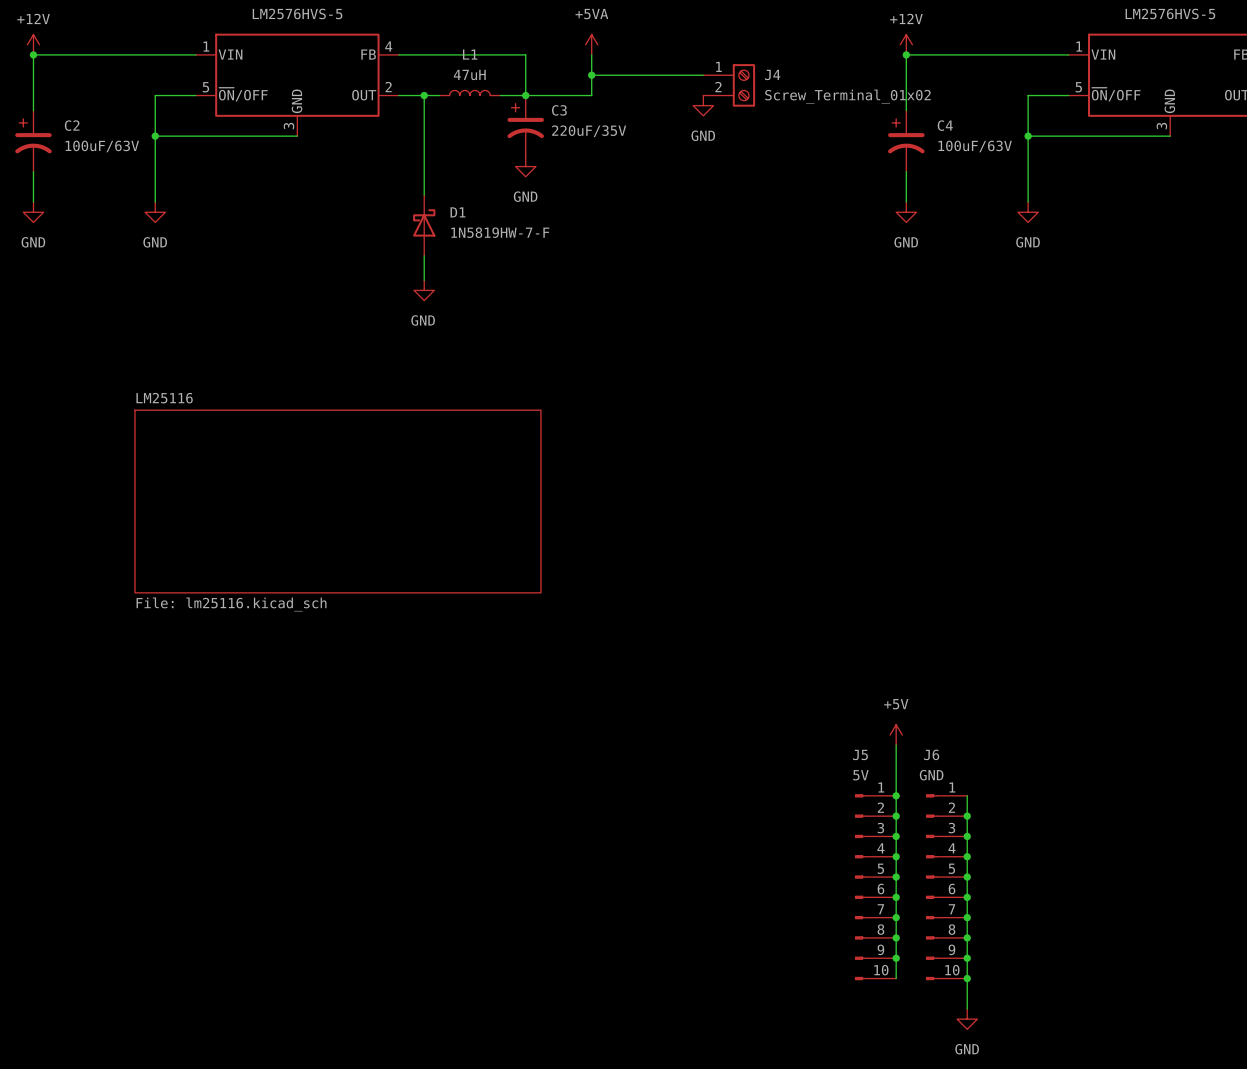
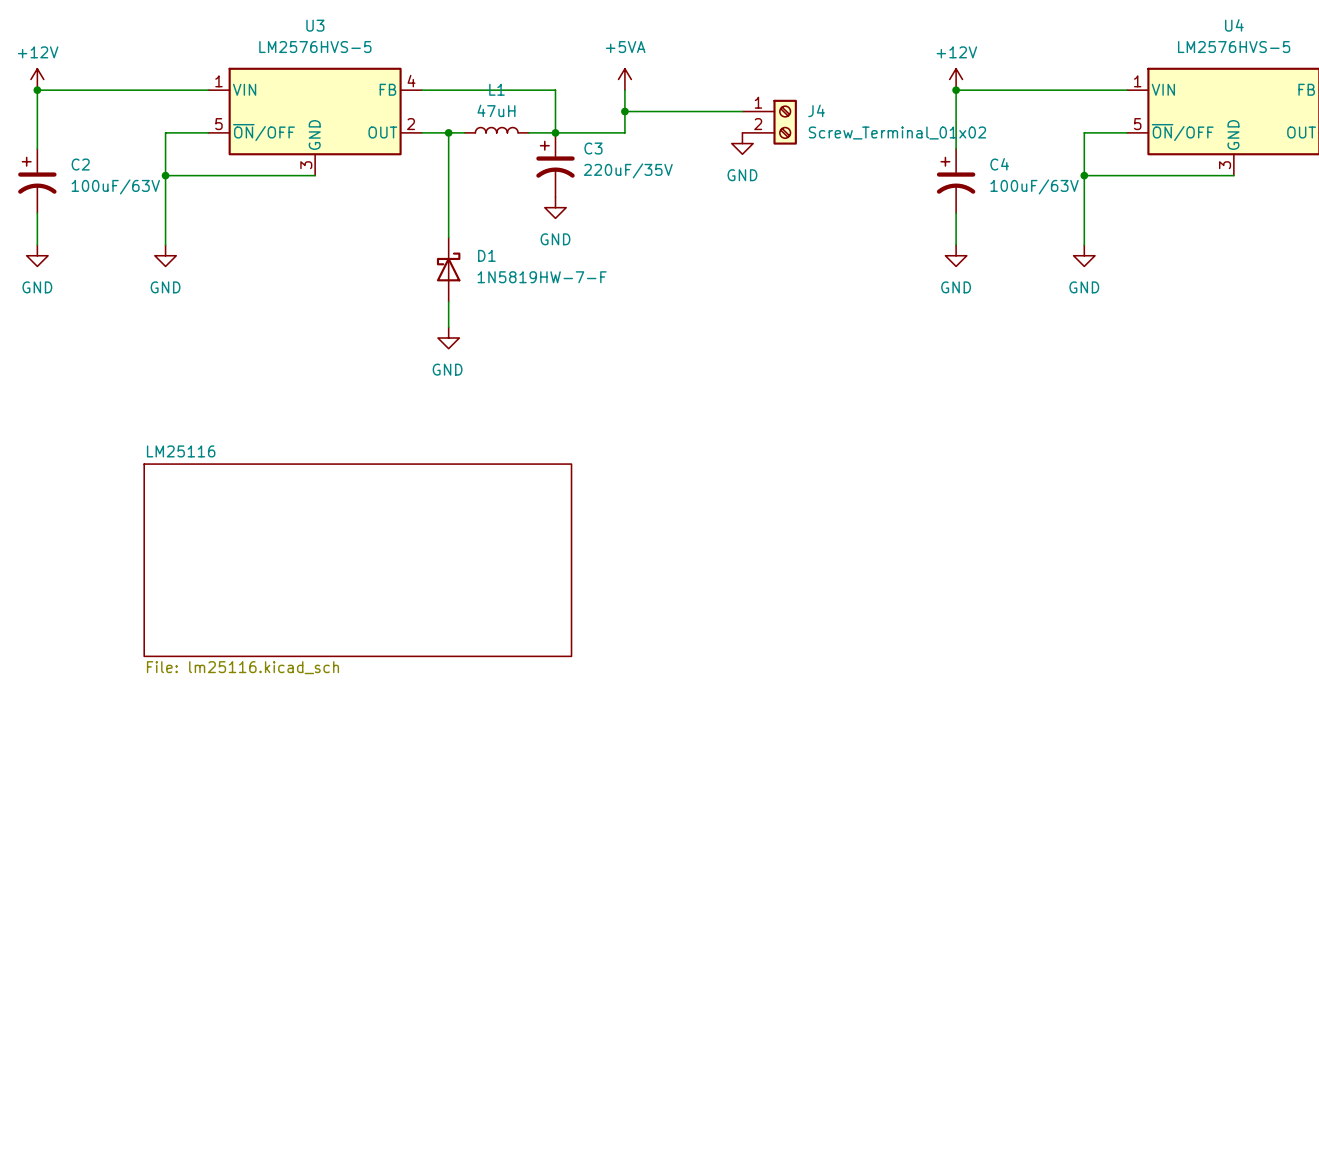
power symbol: +5V (896, 734) -> none
wire: (896, 745) (896, 978) -> none
junction: (896, 795) -> none
wire: (967, 795) (967, 1008) -> none
junction: (896, 816) -> none
junction: (967, 816) -> none
junction: (896, 836) -> none
junction: (967, 836) -> none
junction: (896, 856) -> none
junction: (967, 856) -> none
junction: (896, 877) -> none
junction: (967, 877) -> none
J5: 5V (875, 887) -> none
J6: GND (946, 887) -> none
junction: (896, 897) -> none
junction: (967, 897) -> none
junction: (896, 917) -> none
junction: (967, 917) -> none
junction: (896, 937) -> none
junction: (967, 937) -> none
junction: (896, 958) -> none
junction: (967, 958) -> none
junction: (967, 978) -> none
power symbol: GND (967, 1019) -> none

